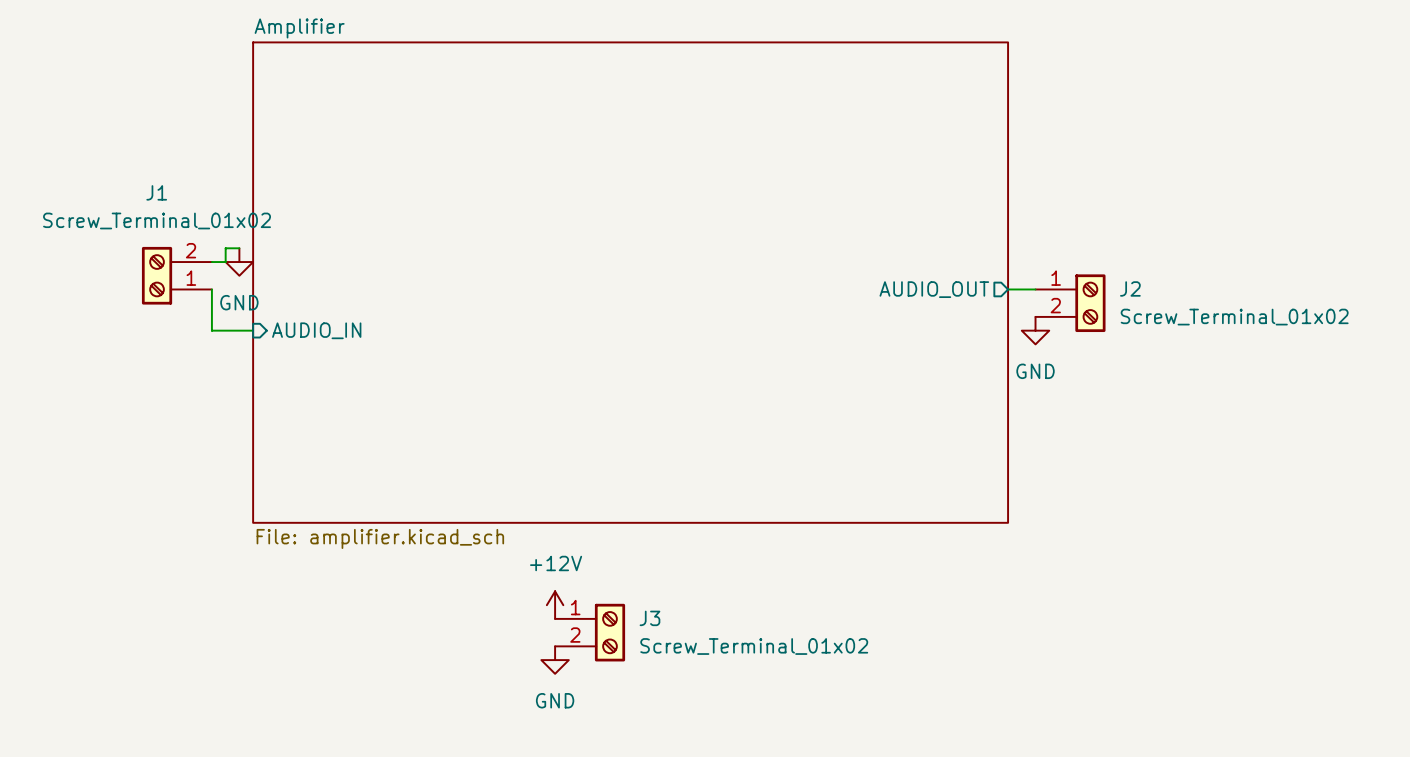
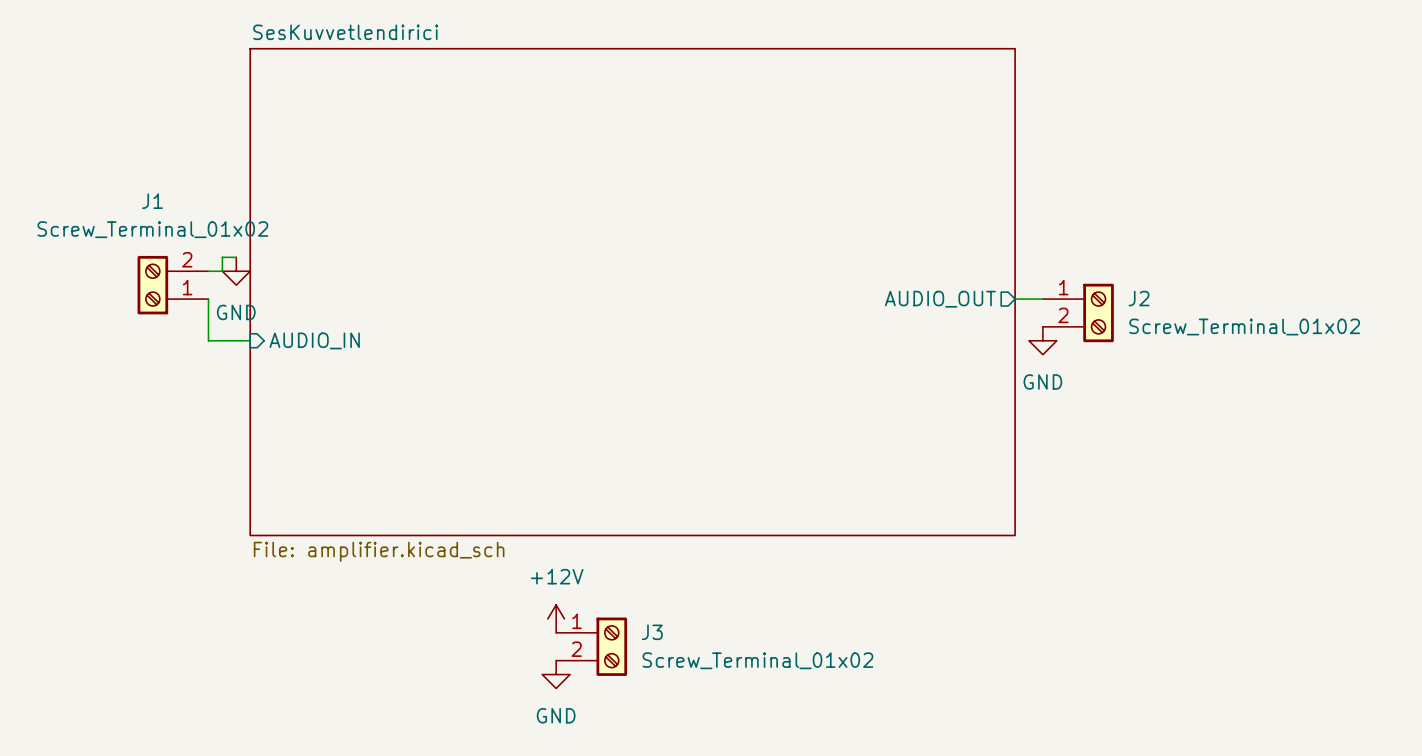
sheet Amplifier name: Amplifier (299, 28) -> SesKuvvetlendirici (345, 32)

